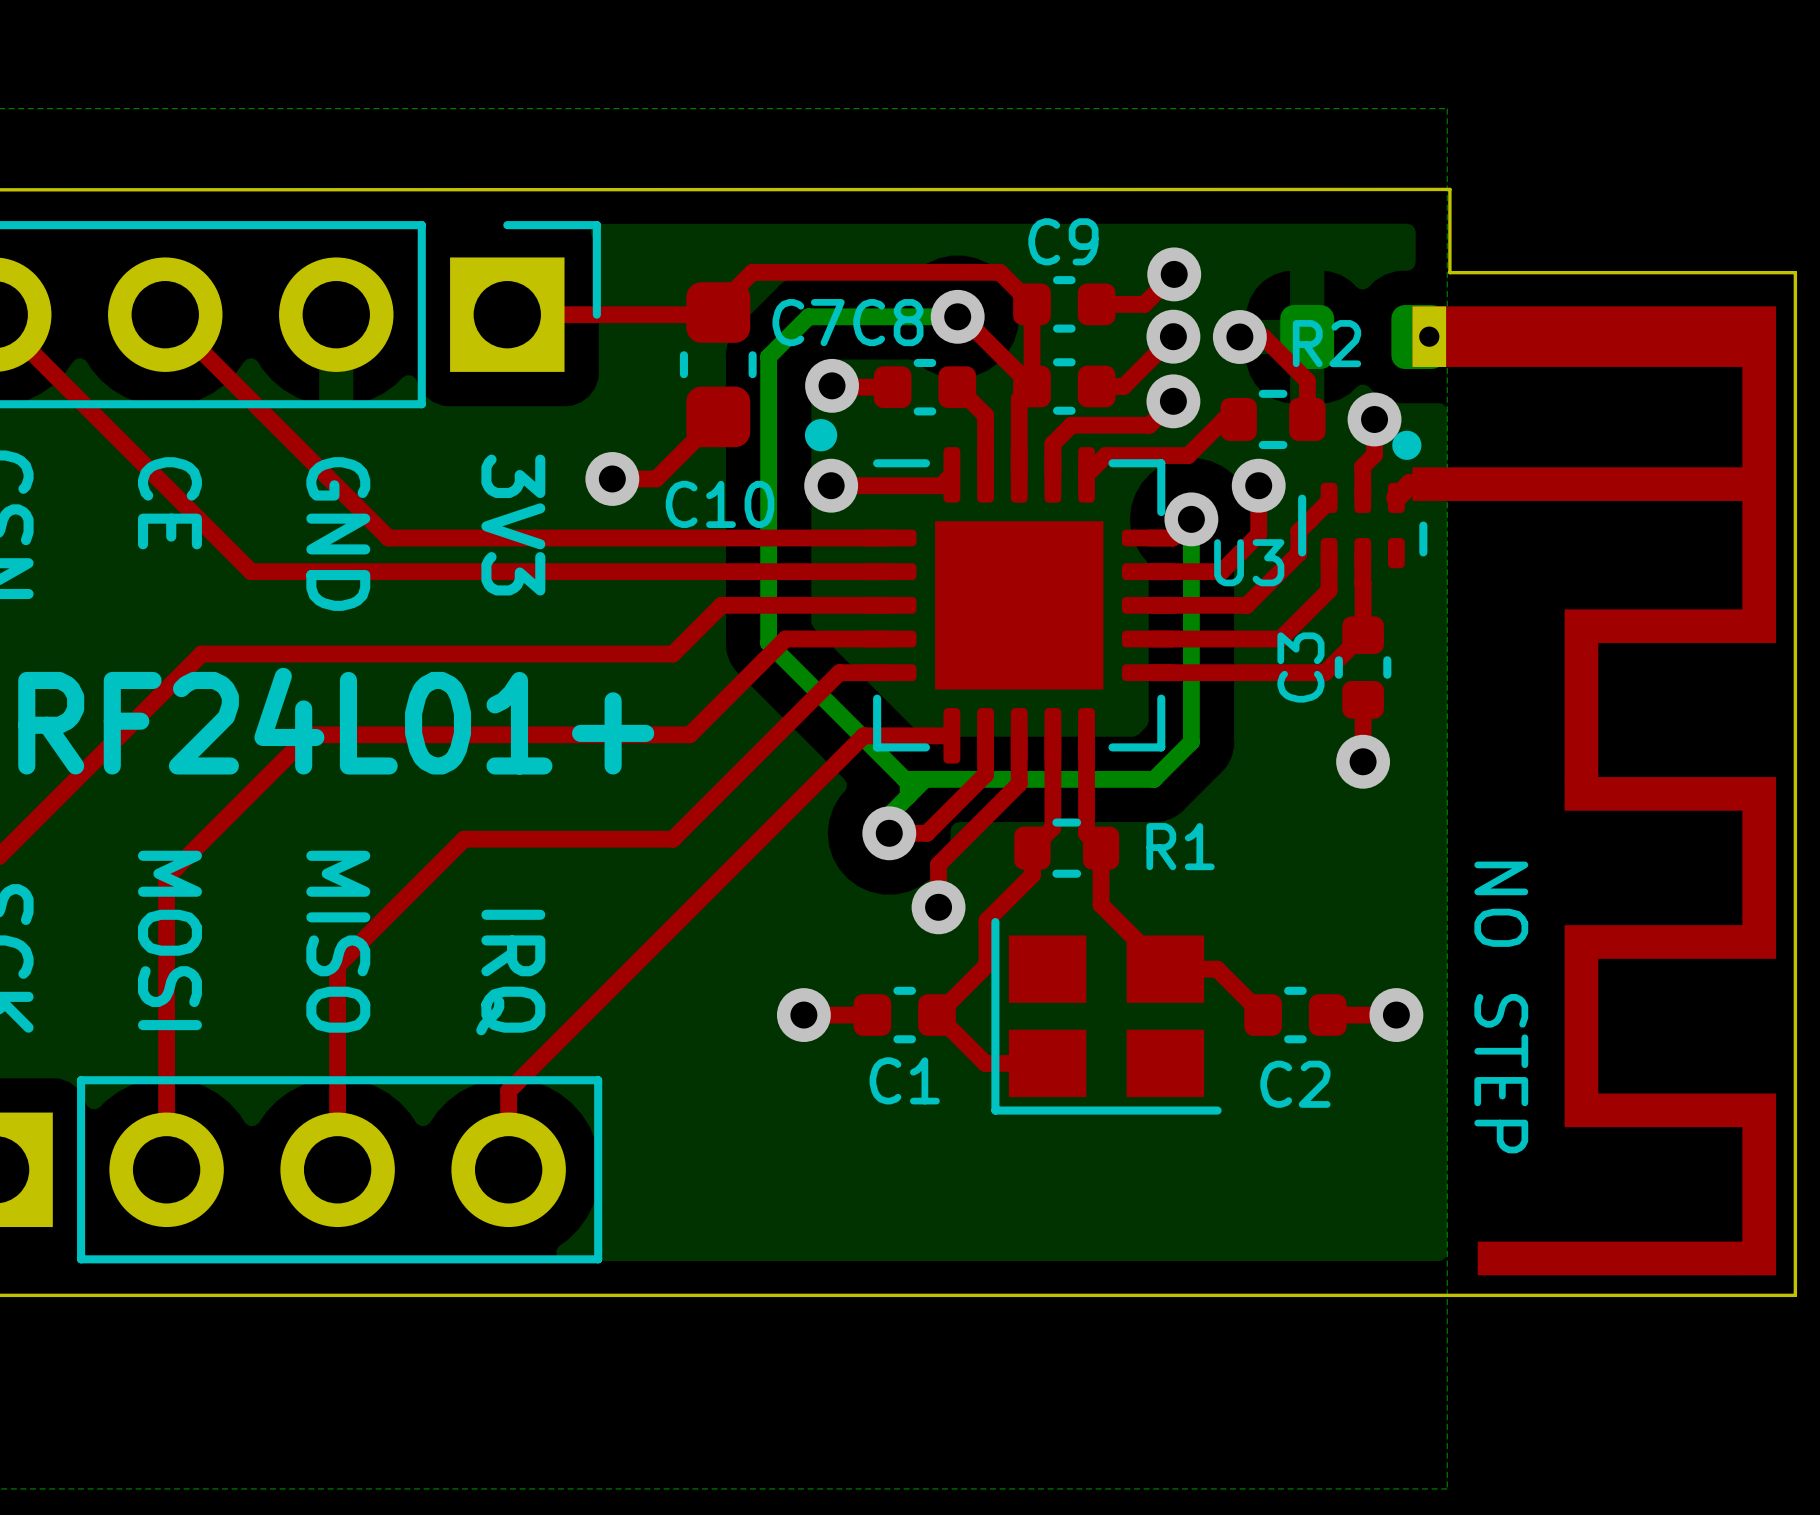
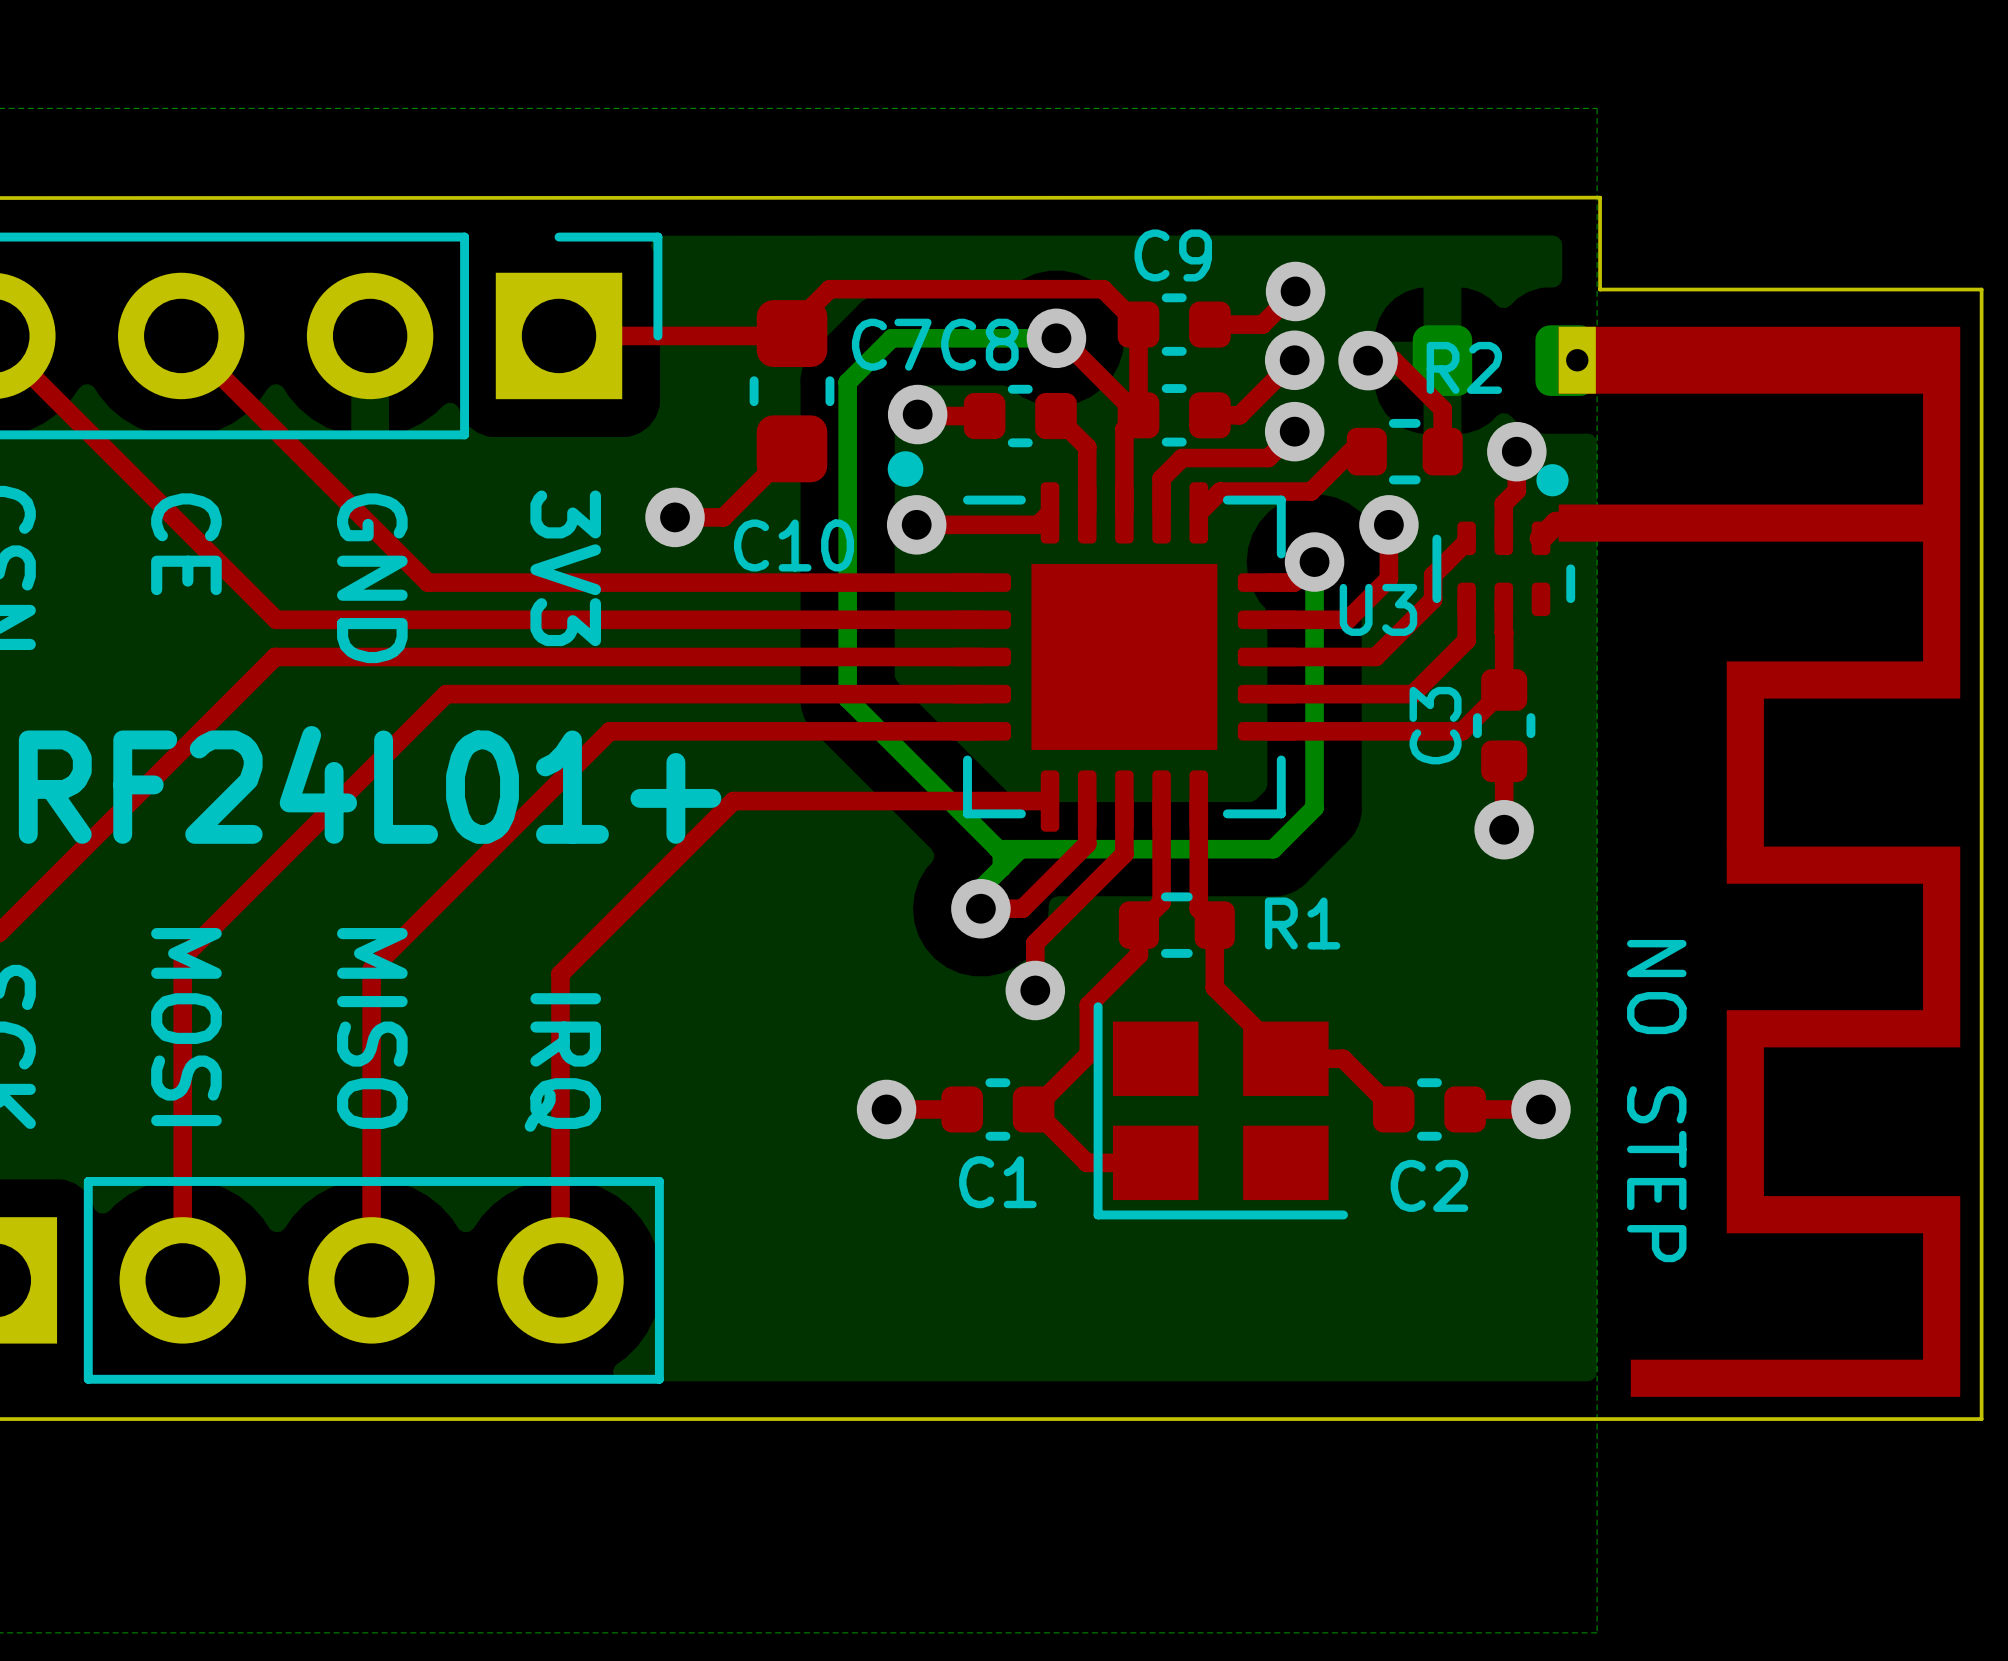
top track: (721, 605) (672, 654) (201, 654) -> (795, 656) (275, 656) (221, 710)
top track: (785, 639) (689, 734) (309, 734) -> (866, 694) (446, 694) (340, 799)
top track: (839, 672) (672, 839) (464, 839) (337, 965) -> (925, 731) (609, 731) (371, 969) (371, 1055)
top track: (863, 735) (508, 1091) -> (952, 801) (733, 801) (560, 974) (560, 1193)

